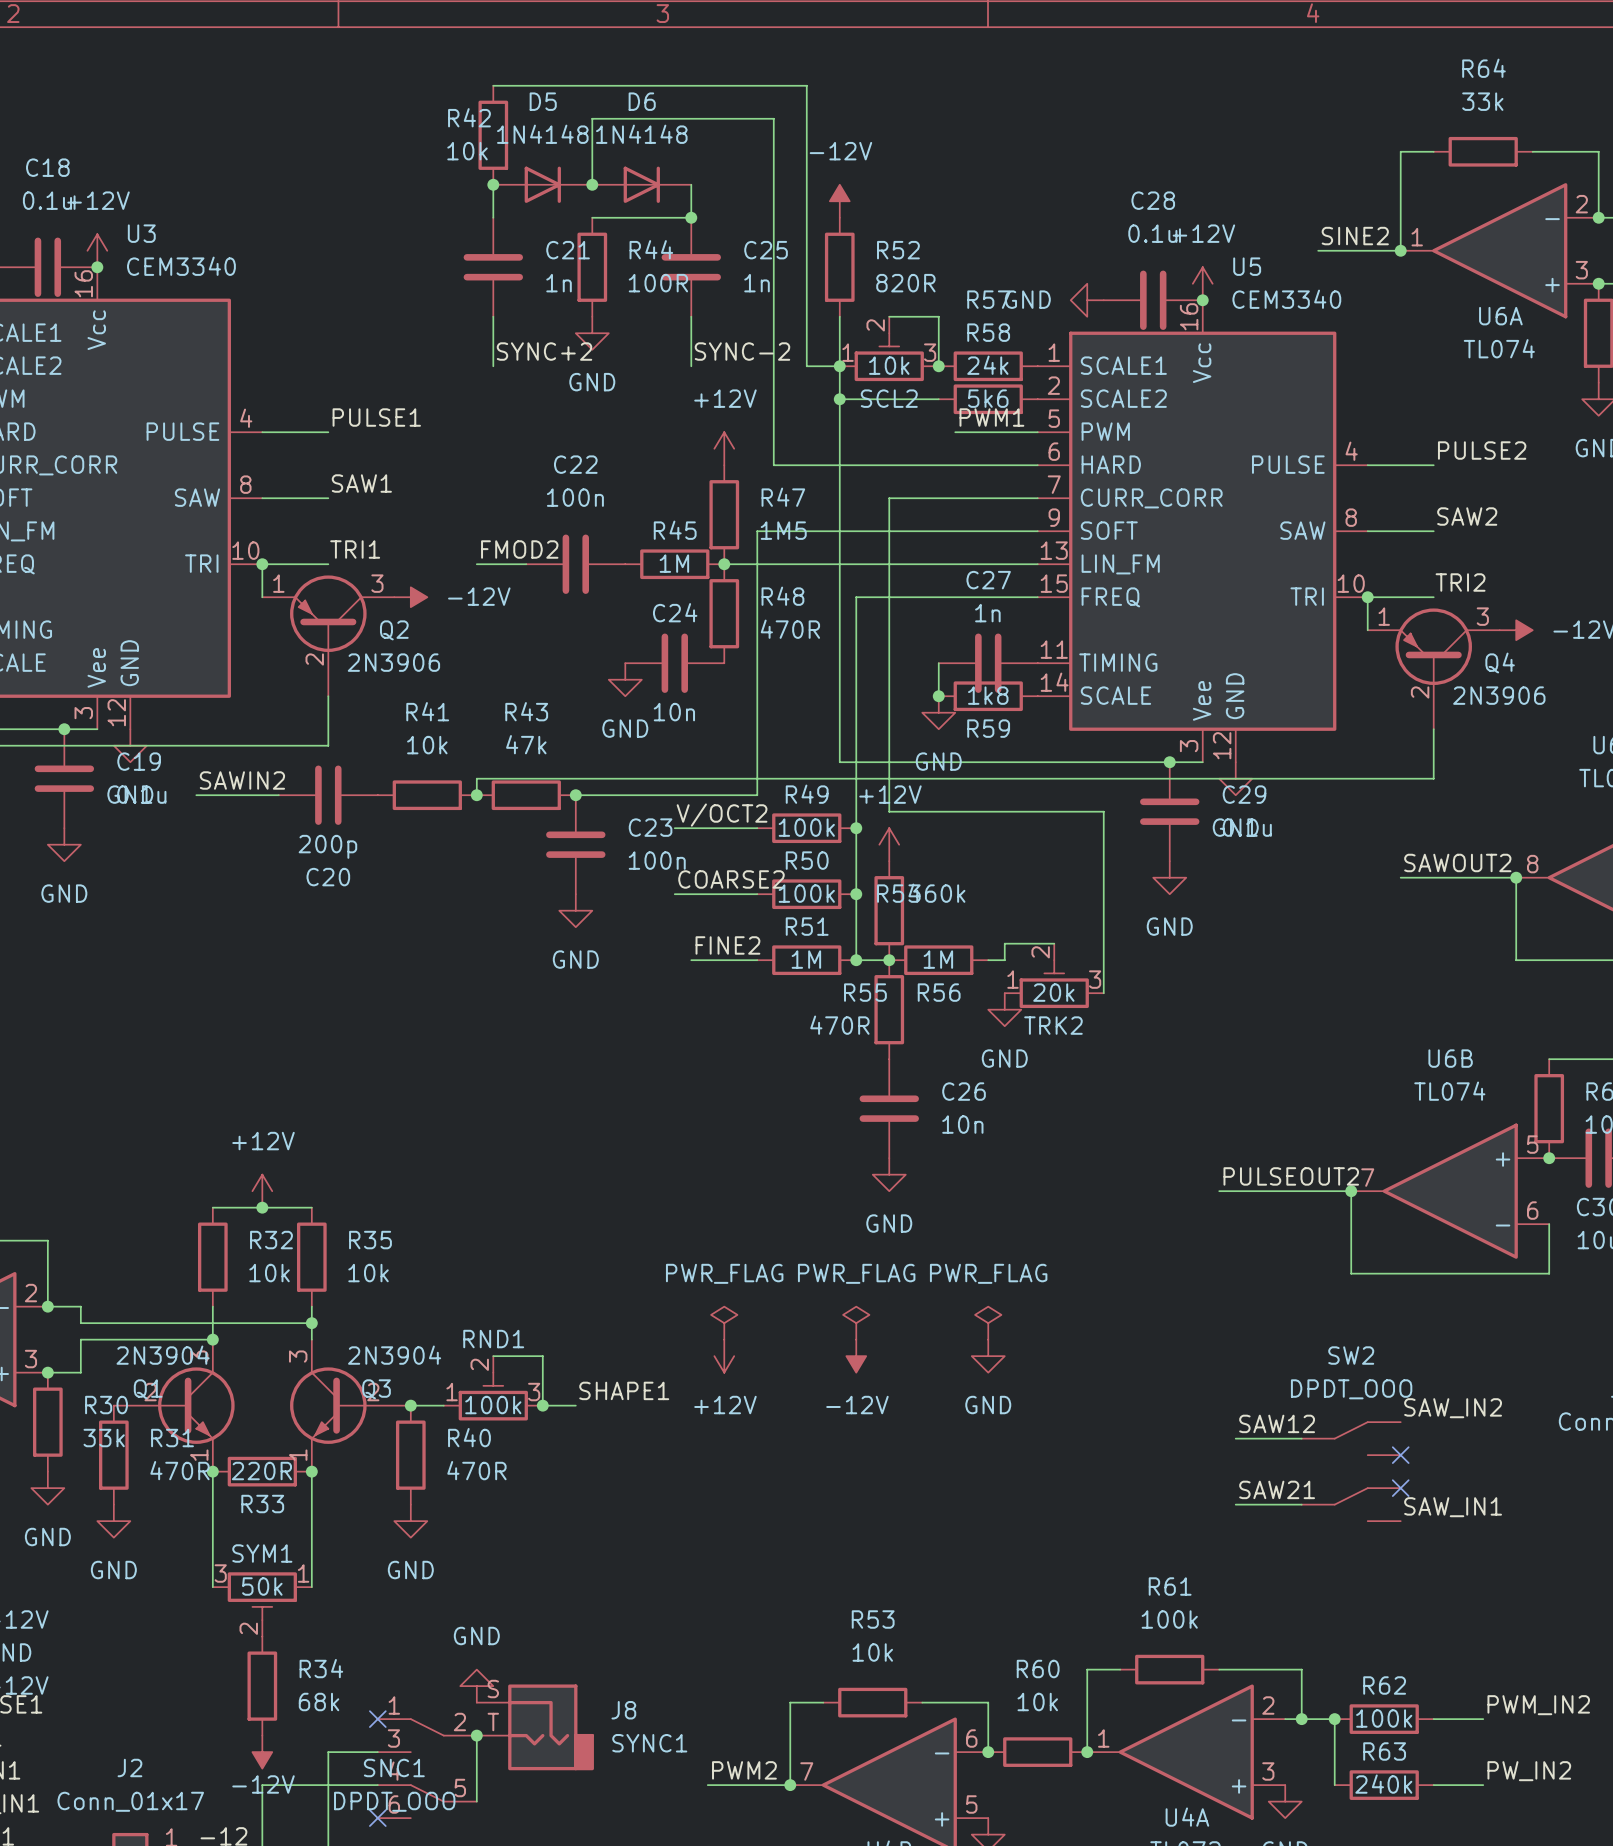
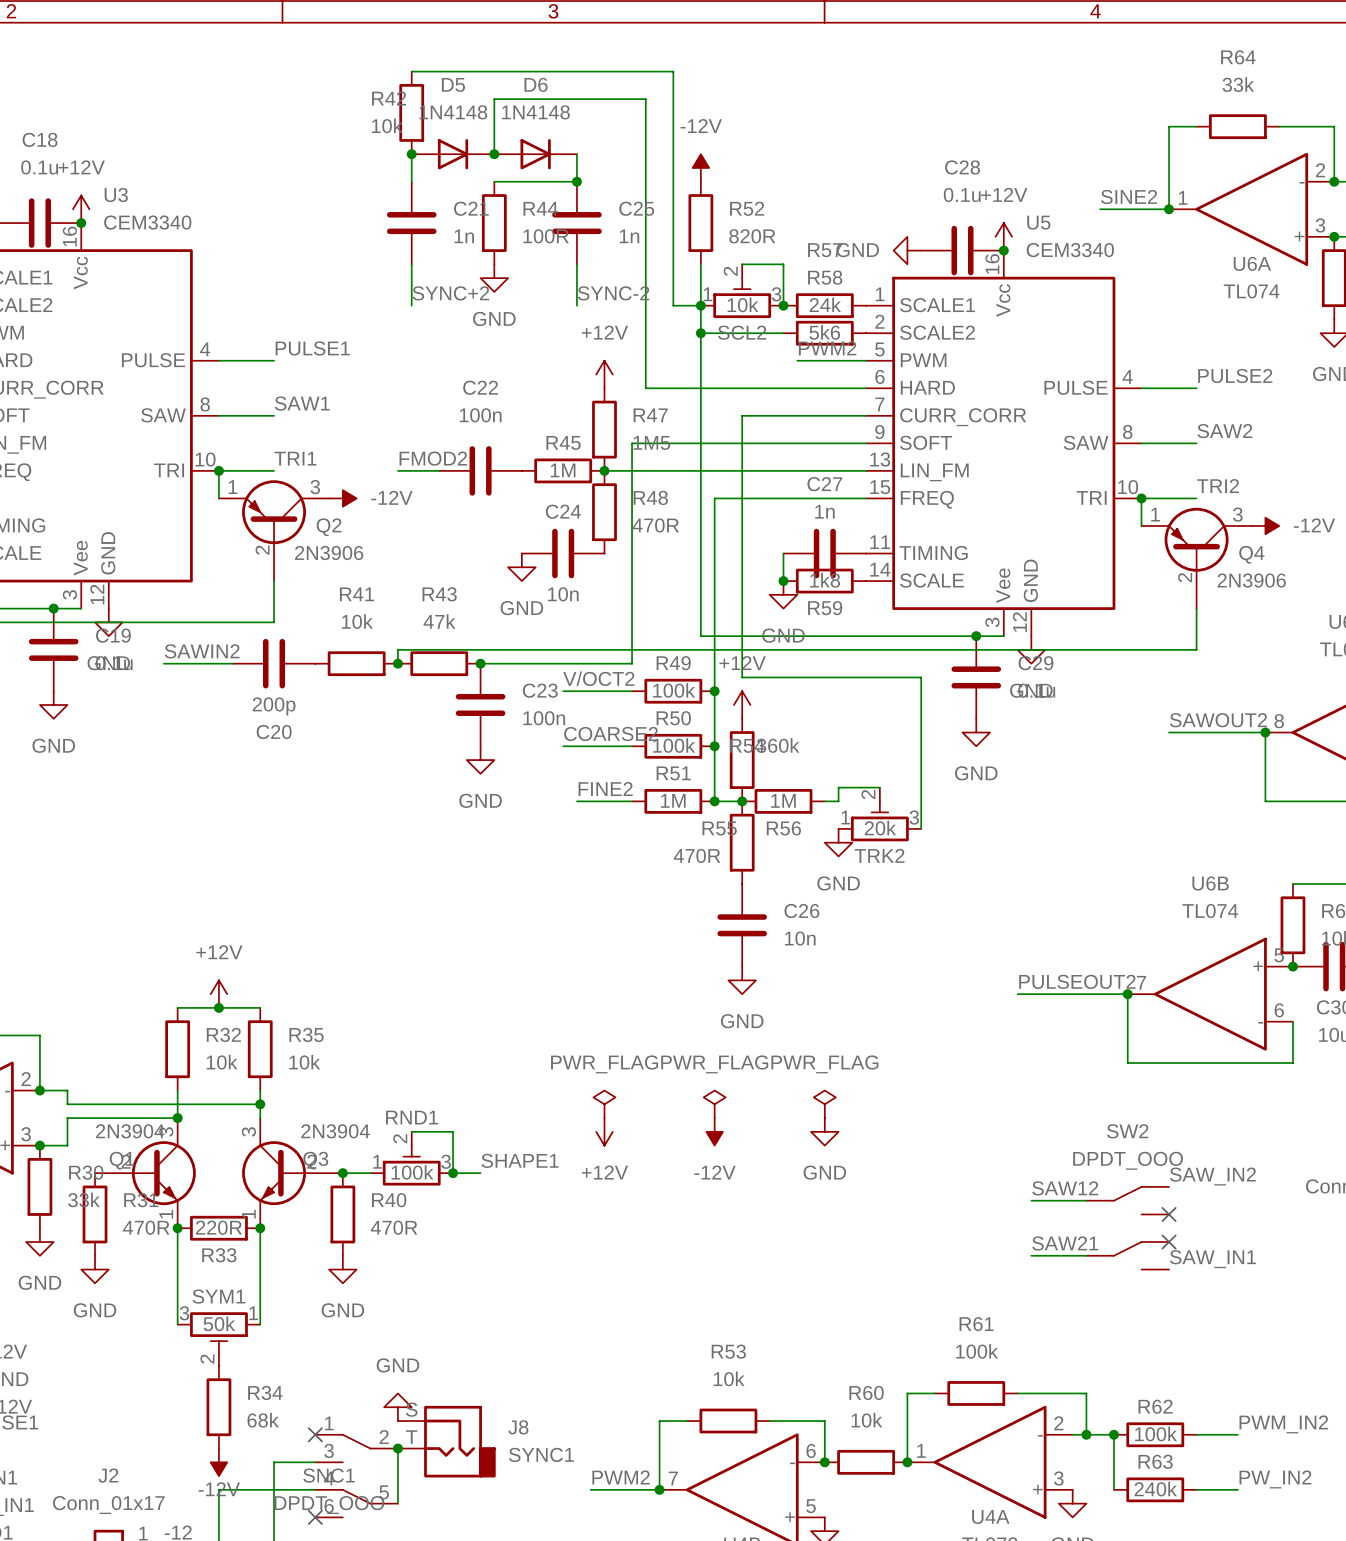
label: PWM1 (991, 417) -> PWM2 (827, 348)

